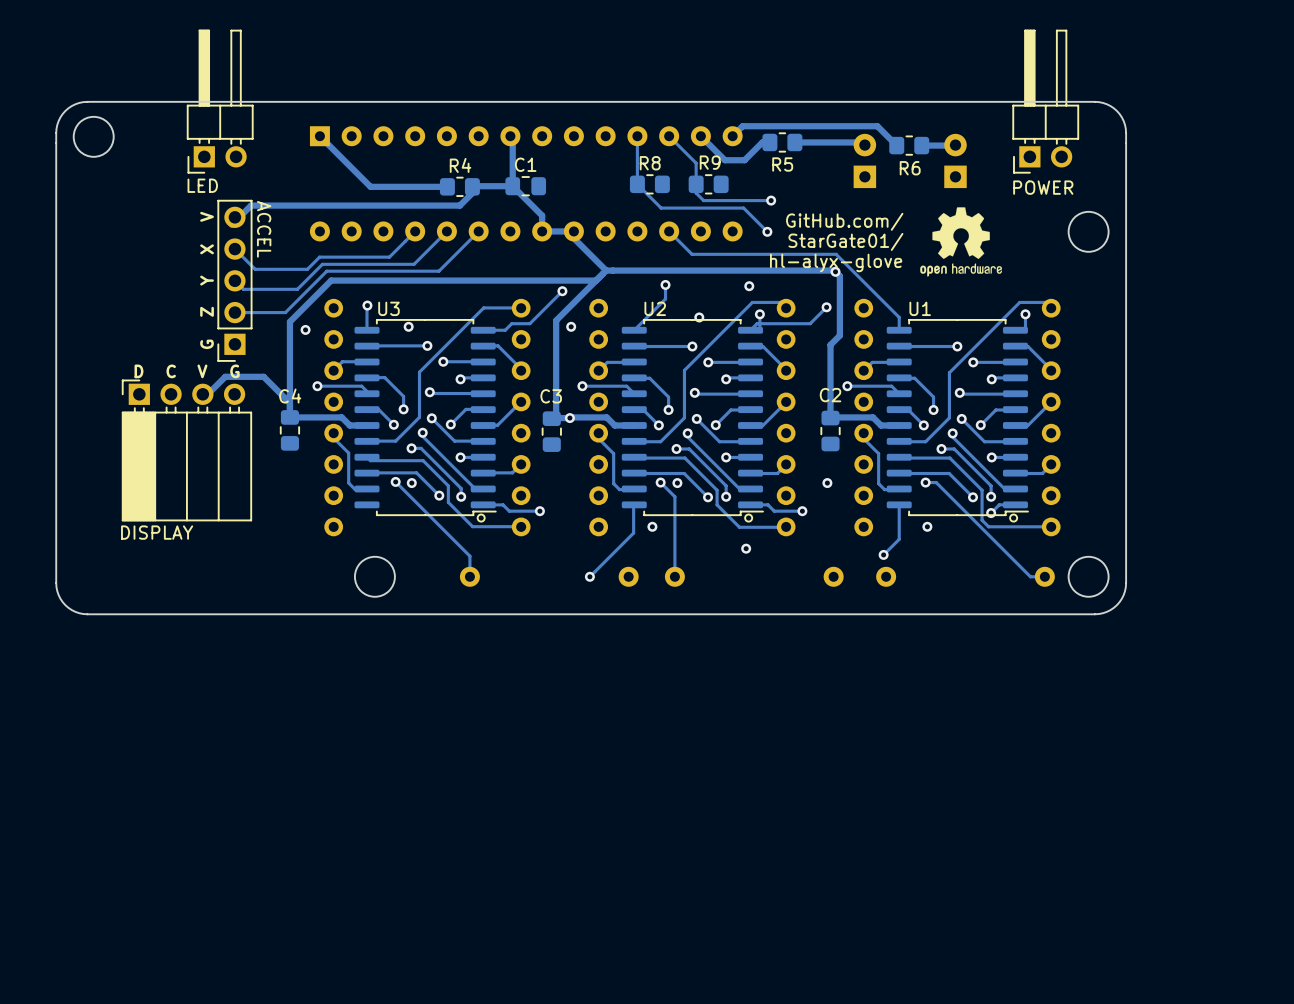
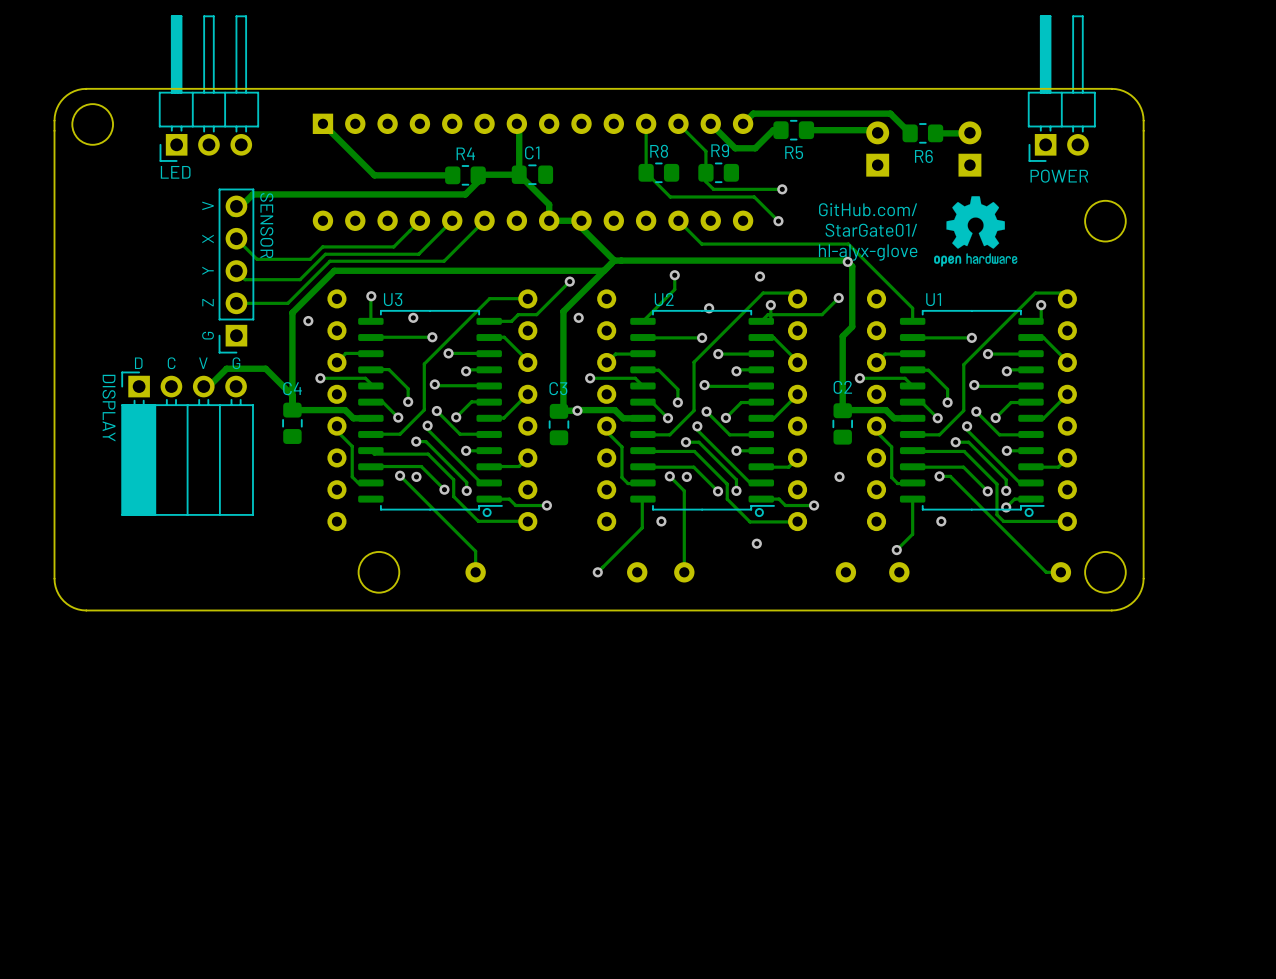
LED footprint: [186, 29, 254, 174] -> [158, 15, 259, 162]
ACCEL name: ACCEL (264, 229) -> SENSOR (266, 225)
DISPLAY name rotation: 0° (157, 532) -> 90° clockwise (109, 408)
DISPLAY name position: DISPLAY (157, 532) -> DISPLAY (109, 408)

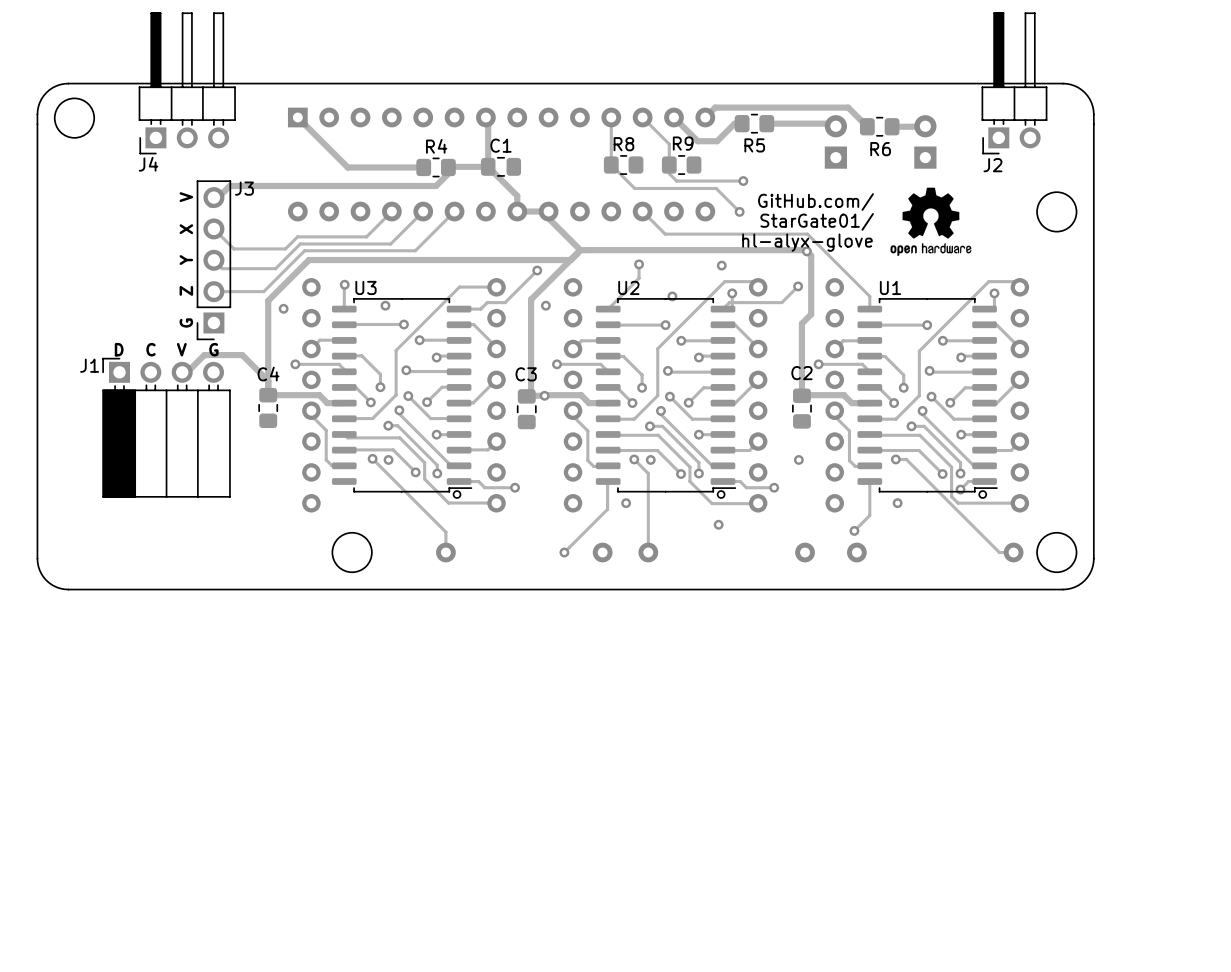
LED name: LED (175, 172) -> J4 (148, 164)
POWER name: POWER (1059, 176) -> J2 (992, 165)
SENSOR name: SENSOR (266, 225) -> J3 (244, 188)
DISPLAY name: DISPLAY (109, 408) -> J1 (89, 365)

